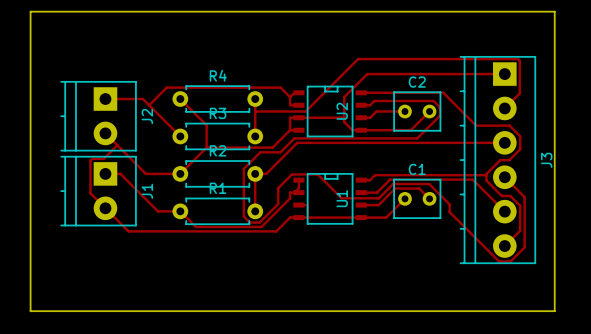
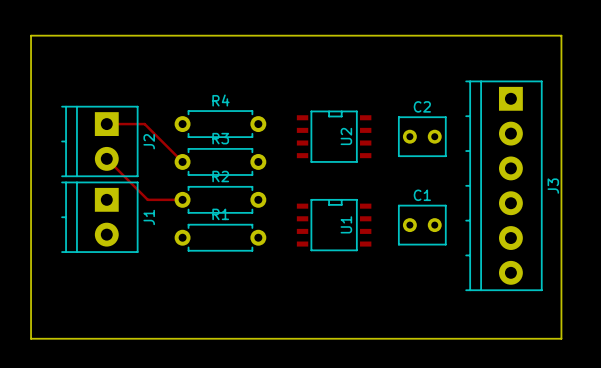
top track: (504, 74) (367, 74) (344, 97) (344, 121) (352, 130) (410, 130) (429, 111) -> none
top track: (298, 92) (294, 92) (290, 97) -> none
top track: (361, 92) (443, 92) (476, 125) (509, 125) (520, 136) (520, 149) (509, 160) (500, 160) (486, 174) (486, 180) (501, 196) (510, 196) (520, 205) (520, 230) (504, 246) -> none
top track: (290, 97) (290, 105) (298, 105) -> none
top track: (290, 97) (280, 87) (166, 87) (149, 105) -> none
top track: (180, 99) (206, 125) (206, 147) -> none
top track: (255, 99) (255, 136) -> none
top track: (361, 105) (370, 105) (374, 101) (433, 101) (439, 107) (439, 115) (417, 138) (294, 138) (280, 152) (260, 152) (243, 168) (243, 216) (249, 222) (259, 222) (278, 204) (278, 188) (291, 174) (317, 174) (341, 198) (378, 198) (393, 184) (429, 184) (449, 204) (449, 212) (499, 261) (510, 261) (524, 247) (524, 197) (504, 177) -> none
top track: (504, 108) (519, 93) (519, 60) (518, 59) (358, 59) (305, 111) (255, 111) -> none
top track: (404, 111) (376, 111) (370, 117) (361, 117) -> none
top track: (344, 117) (290, 117) (290, 130) -> none
top track: (298, 130) (290, 130) (272, 147) (206, 147) -> none
top track: (504, 142) (297, 142) (266, 173) (255, 173) (255, 211) -> none
top track: (117, 145) (103, 158) (90, 160) (90, 193) (128, 231) (276, 231) (290, 217) (386, 217) (404, 198) -> none
top track: (206, 147) (180, 173) -> none
top track: (105, 173) (120, 173) (157, 211) (180, 211) (195, 226) (261, 226) (290, 198) (290, 192) (298, 192) -> none
top track: (486, 175) (375, 175) (370, 180) (361, 180) -> none
top track: (298, 180) (298, 188) (294, 192) -> none
top track: (361, 192) (377, 192) (390, 179) (472, 179) (504, 211) -> none
top track: (429, 198) (419, 188) (395, 188) (378, 205) (361, 205) -> none
top track: (298, 205) (307, 205) (307, 217) -> none

